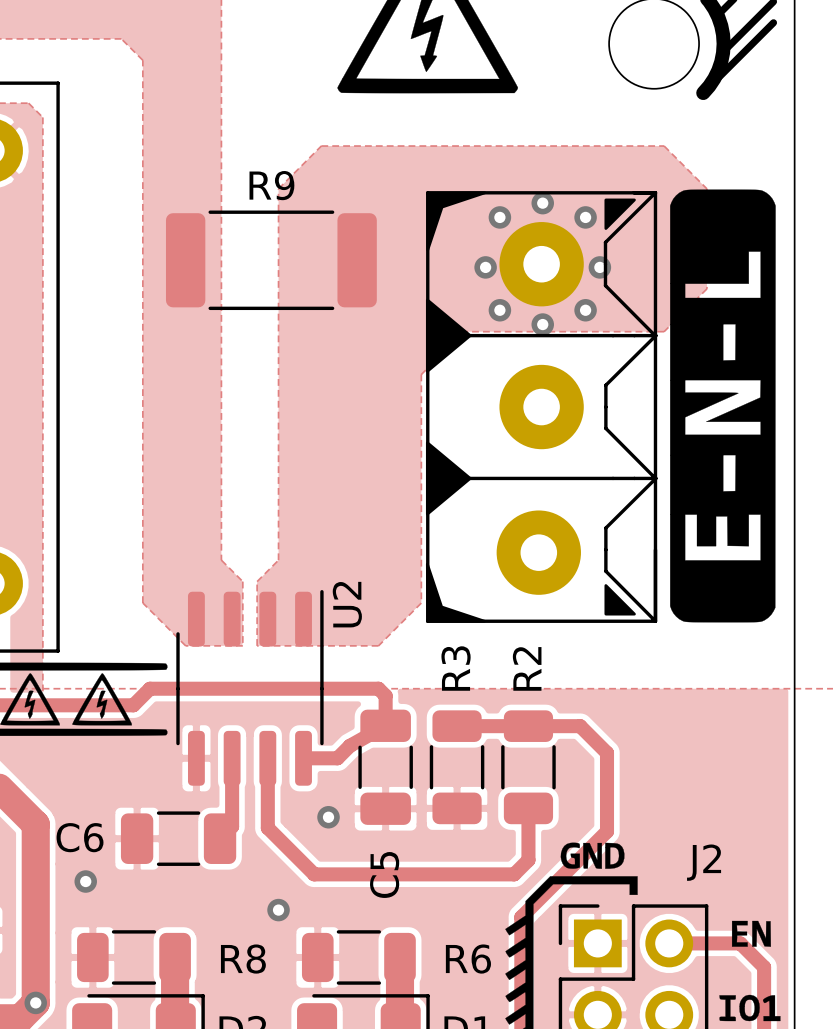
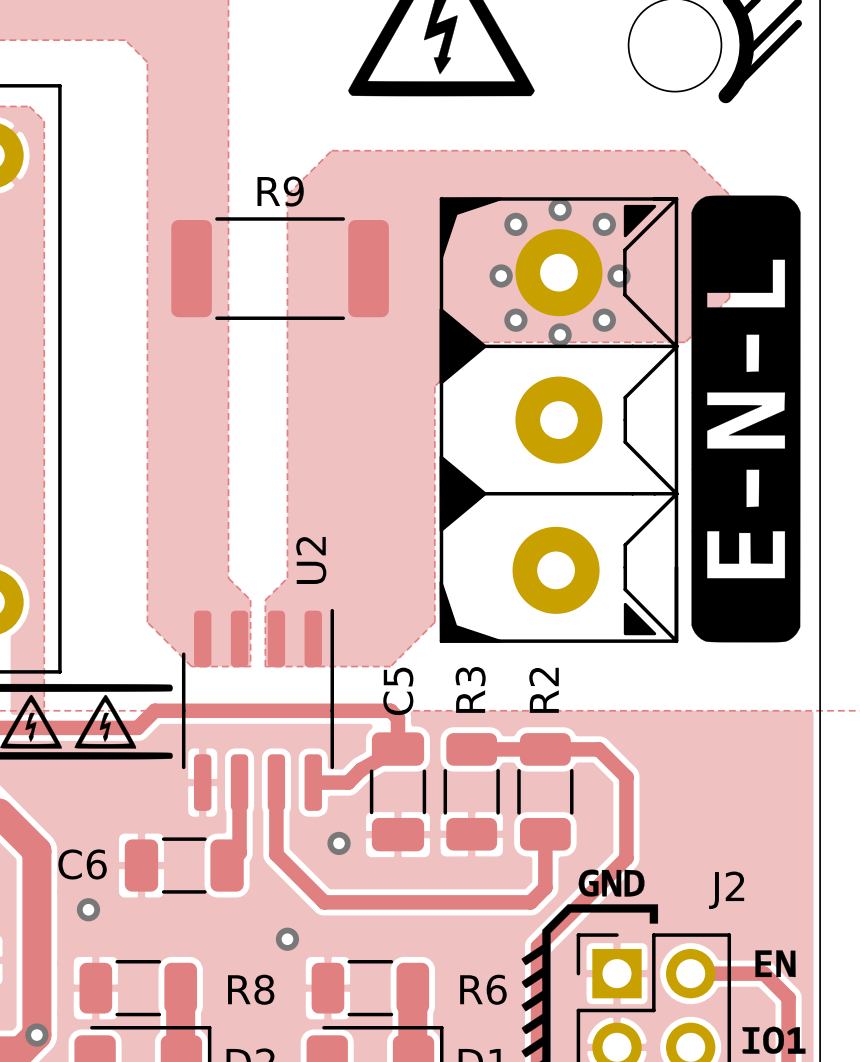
U2 name position: U2 (347, 604) -> U2 (311, 560)
C5 name position: C5 (384, 874) -> C5 (398, 691)

